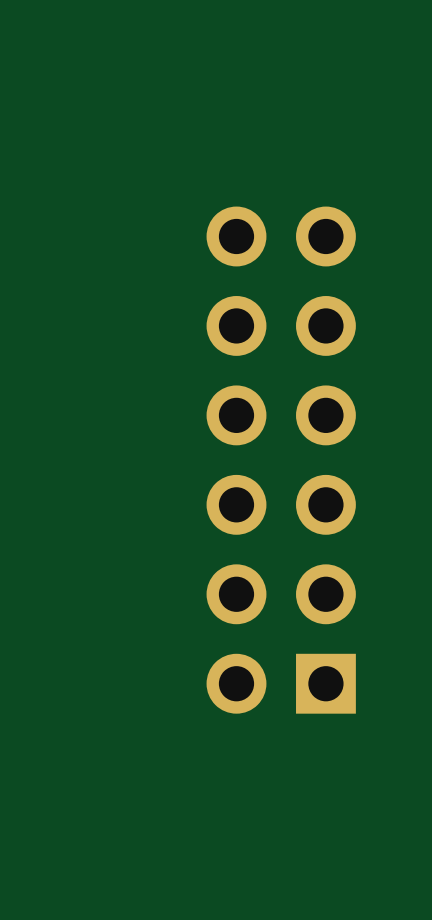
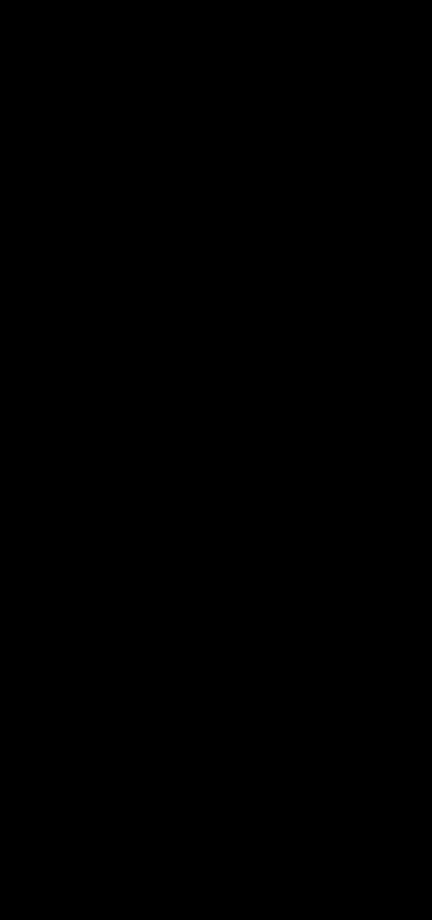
part: (281, 460) -> none

